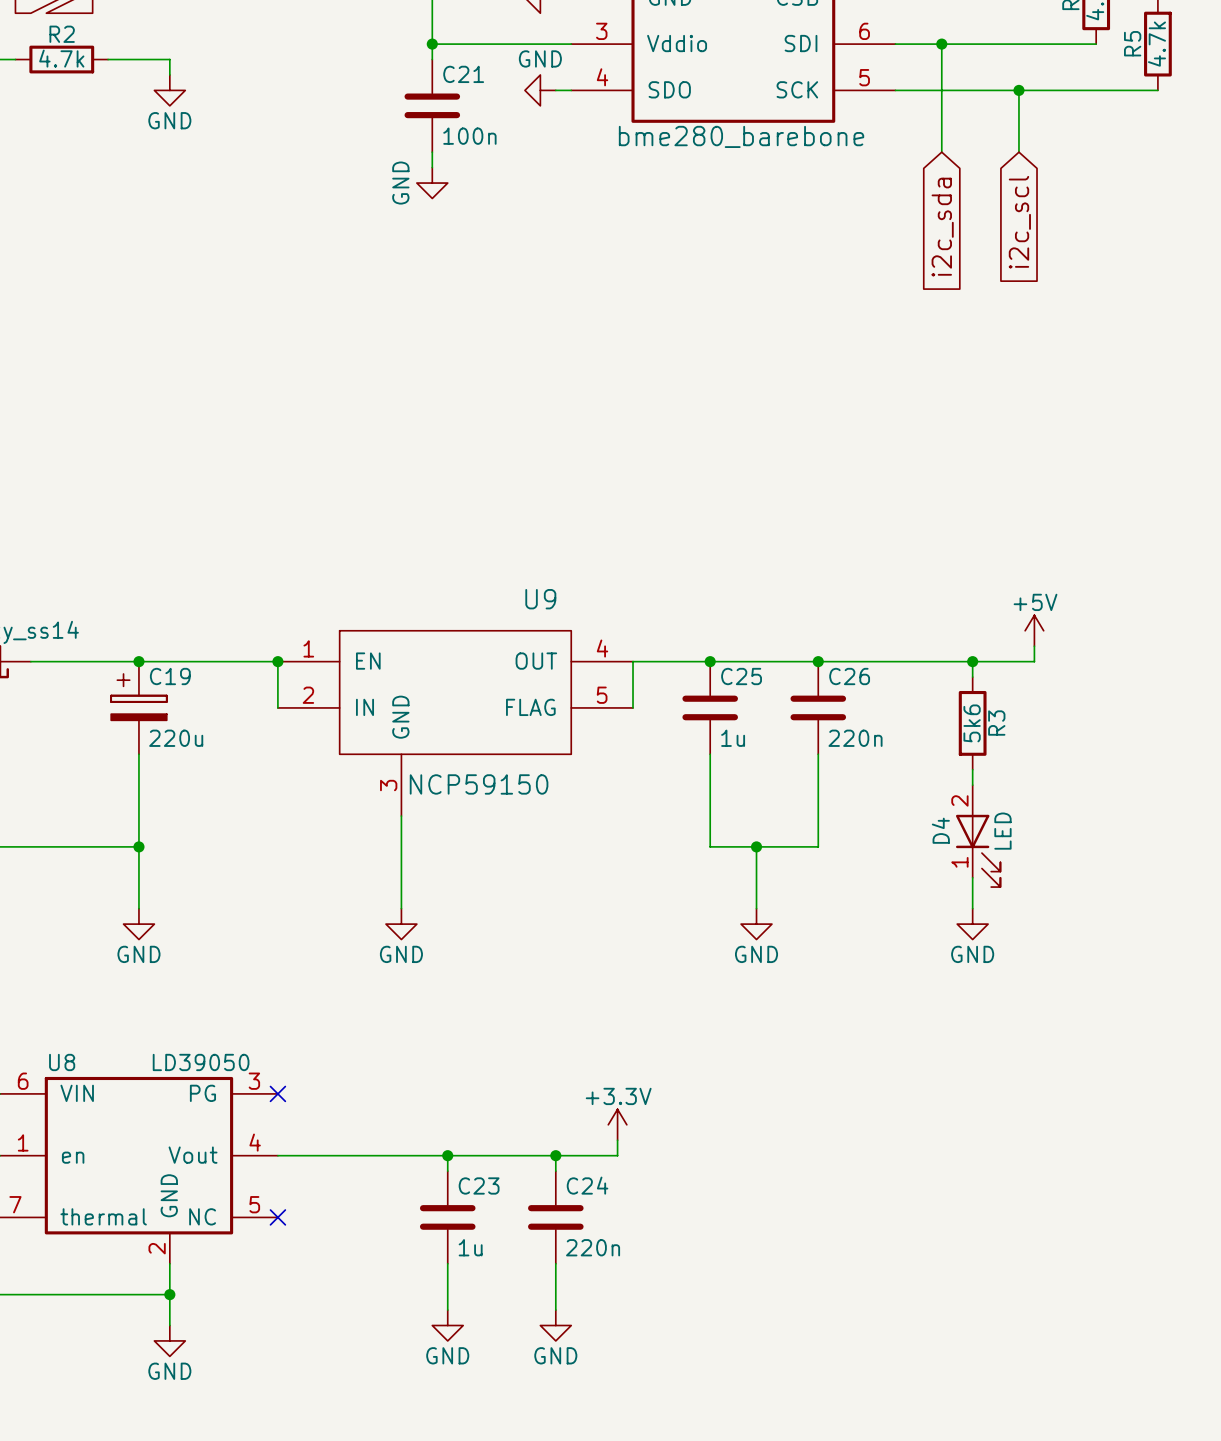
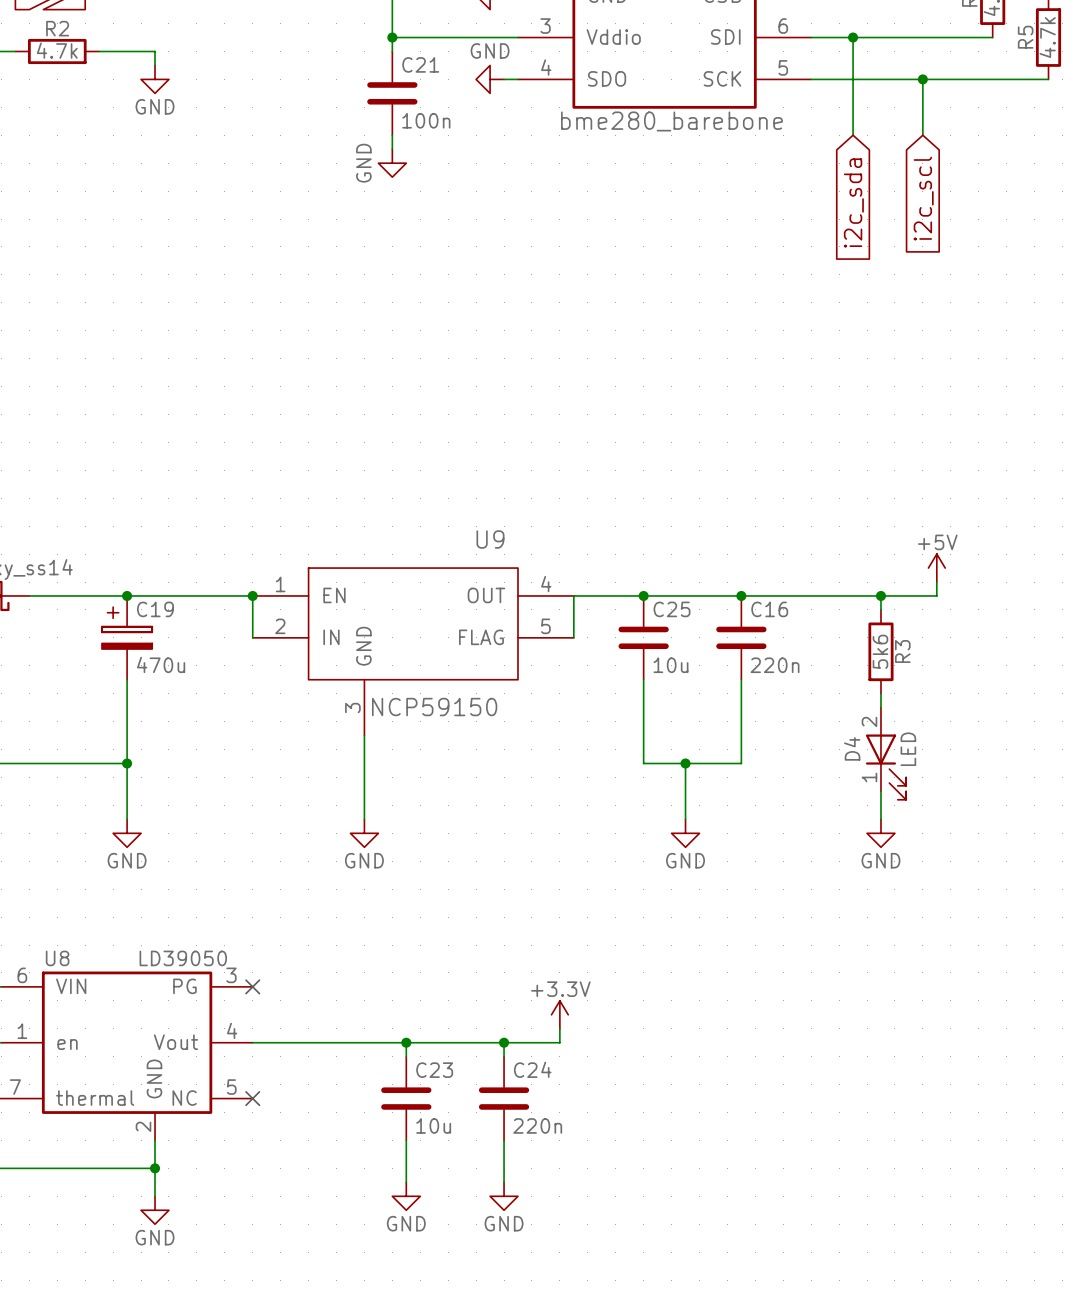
C26 name: C26 (849, 676) -> C16 (769, 609)
C19 value: 220u (176, 738) -> 470u (161, 664)
C25 value: 1u (733, 738) -> 10u (671, 665)
C23 value: 1u (470, 1247) -> 10u (433, 1125)

